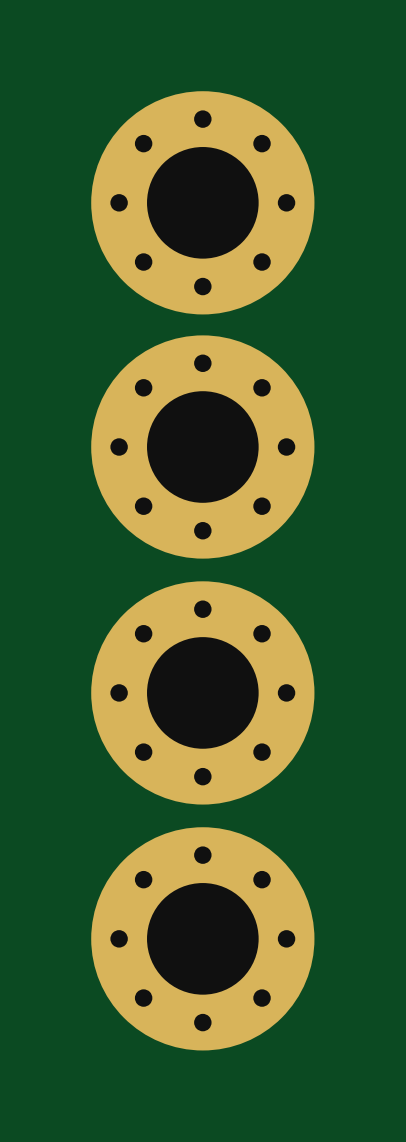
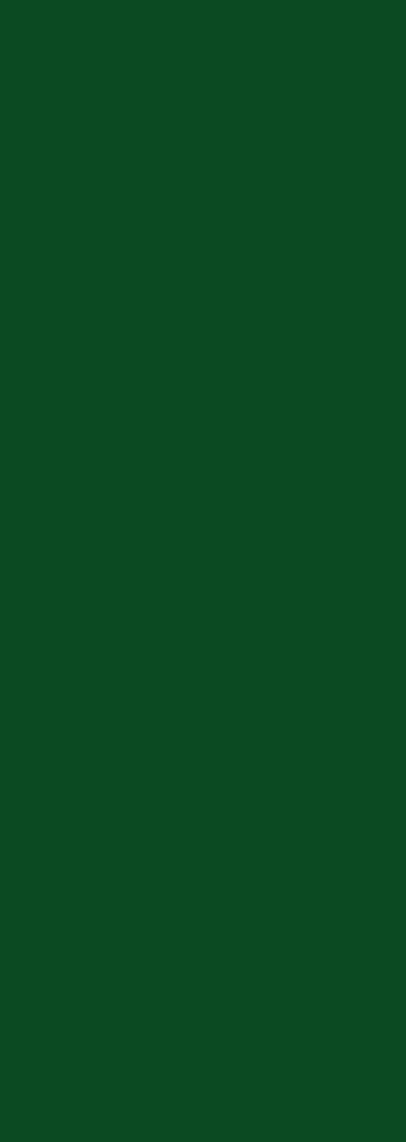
part: (202, 202) -> none
part: (202, 447) -> none
part: (202, 692) -> none
part: (202, 938) -> none

